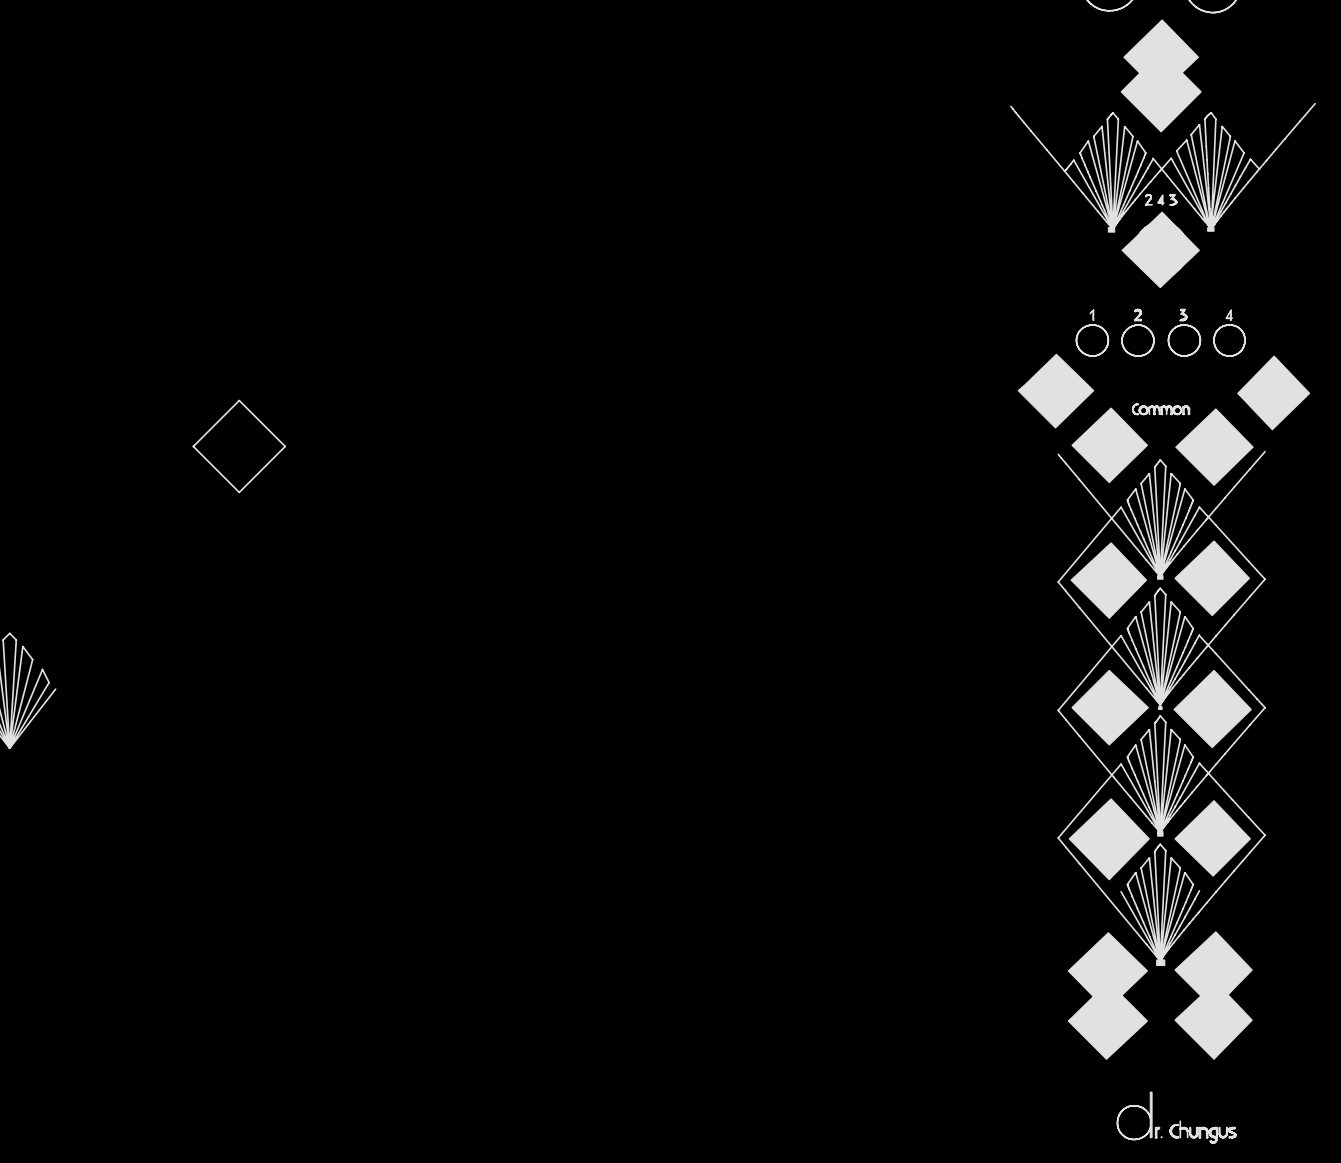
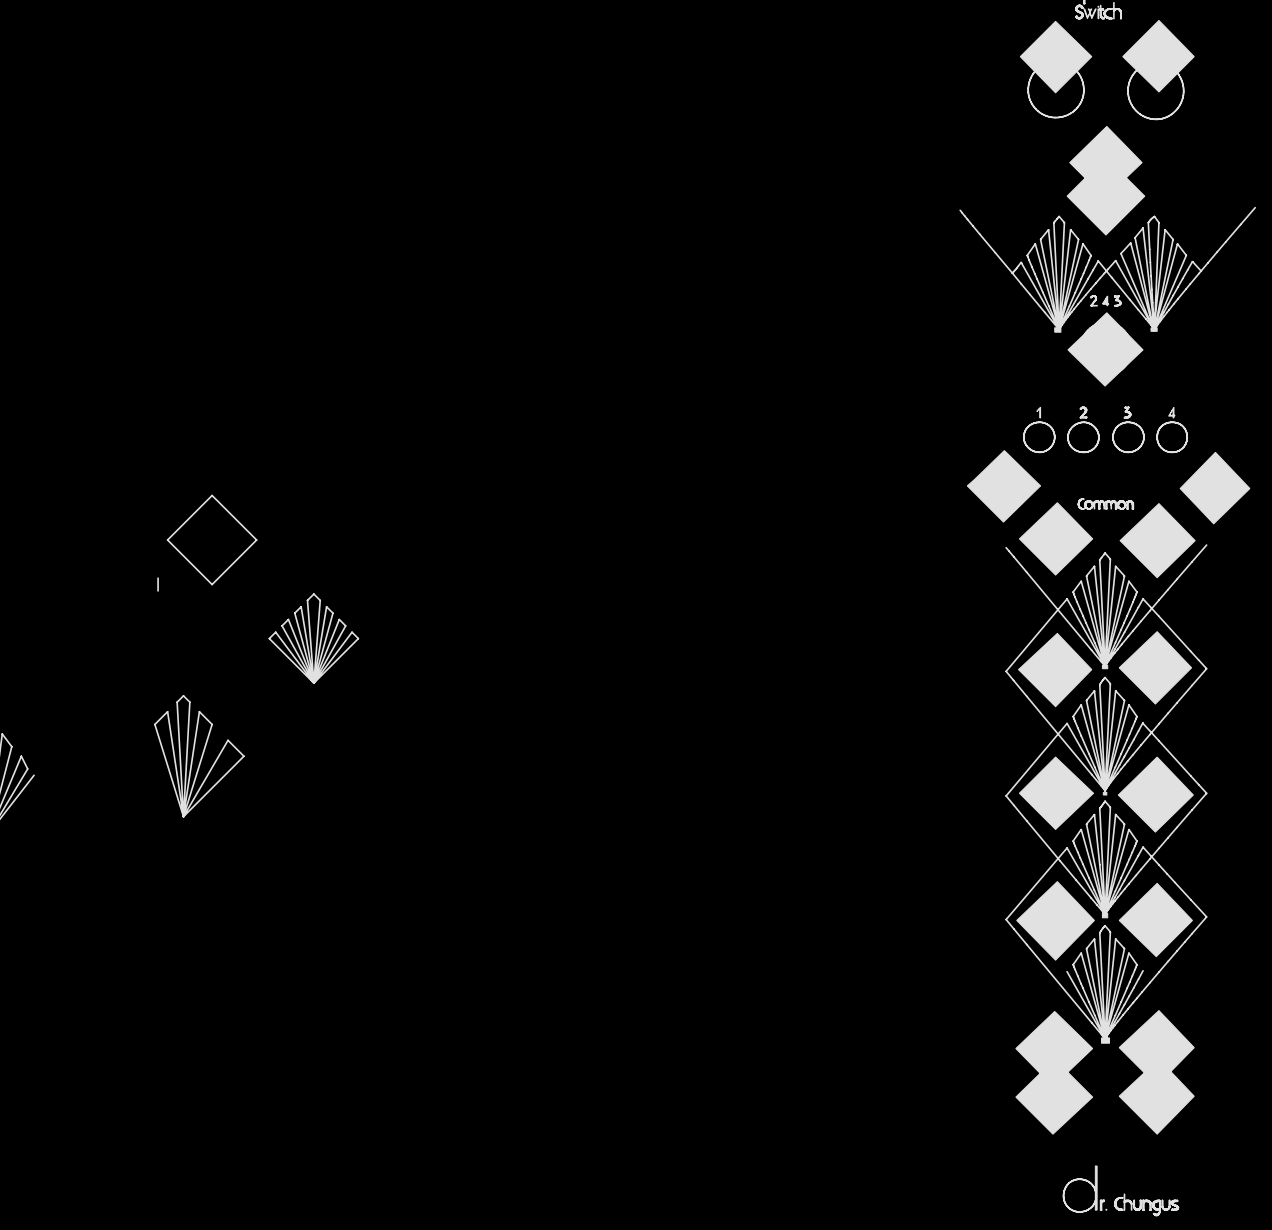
line: none -> (158, 578) (158, 590)
line: none -> (313, 683) (269, 638) (275, 632) (313, 683)
line: none -> (313, 683) (358, 638) (352, 632) (313, 683)
line: none -> (313, 683) (307, 600) (313, 594) (320, 600) (313, 683)
line: none -> (313, 683) (301, 606) (294, 613) (313, 683)
line: none -> (313, 683) (326, 606) (332, 613) (313, 683)
line: none -> (313, 683) (288, 619) (282, 625) (313, 683)
line: none -> (313, 683) (339, 619) (345, 625) (313, 683)
line: none -> (183, 816) (243, 756) (228, 740) (183, 816)
line: none -> (183, 816) (177, 702) (183, 695) (189, 702) (183, 816)
line: none -> (183, 816) (167, 711) (154, 724) (183, 816)
line: none -> (183, 816) (199, 711) (212, 724) (183, 816)

